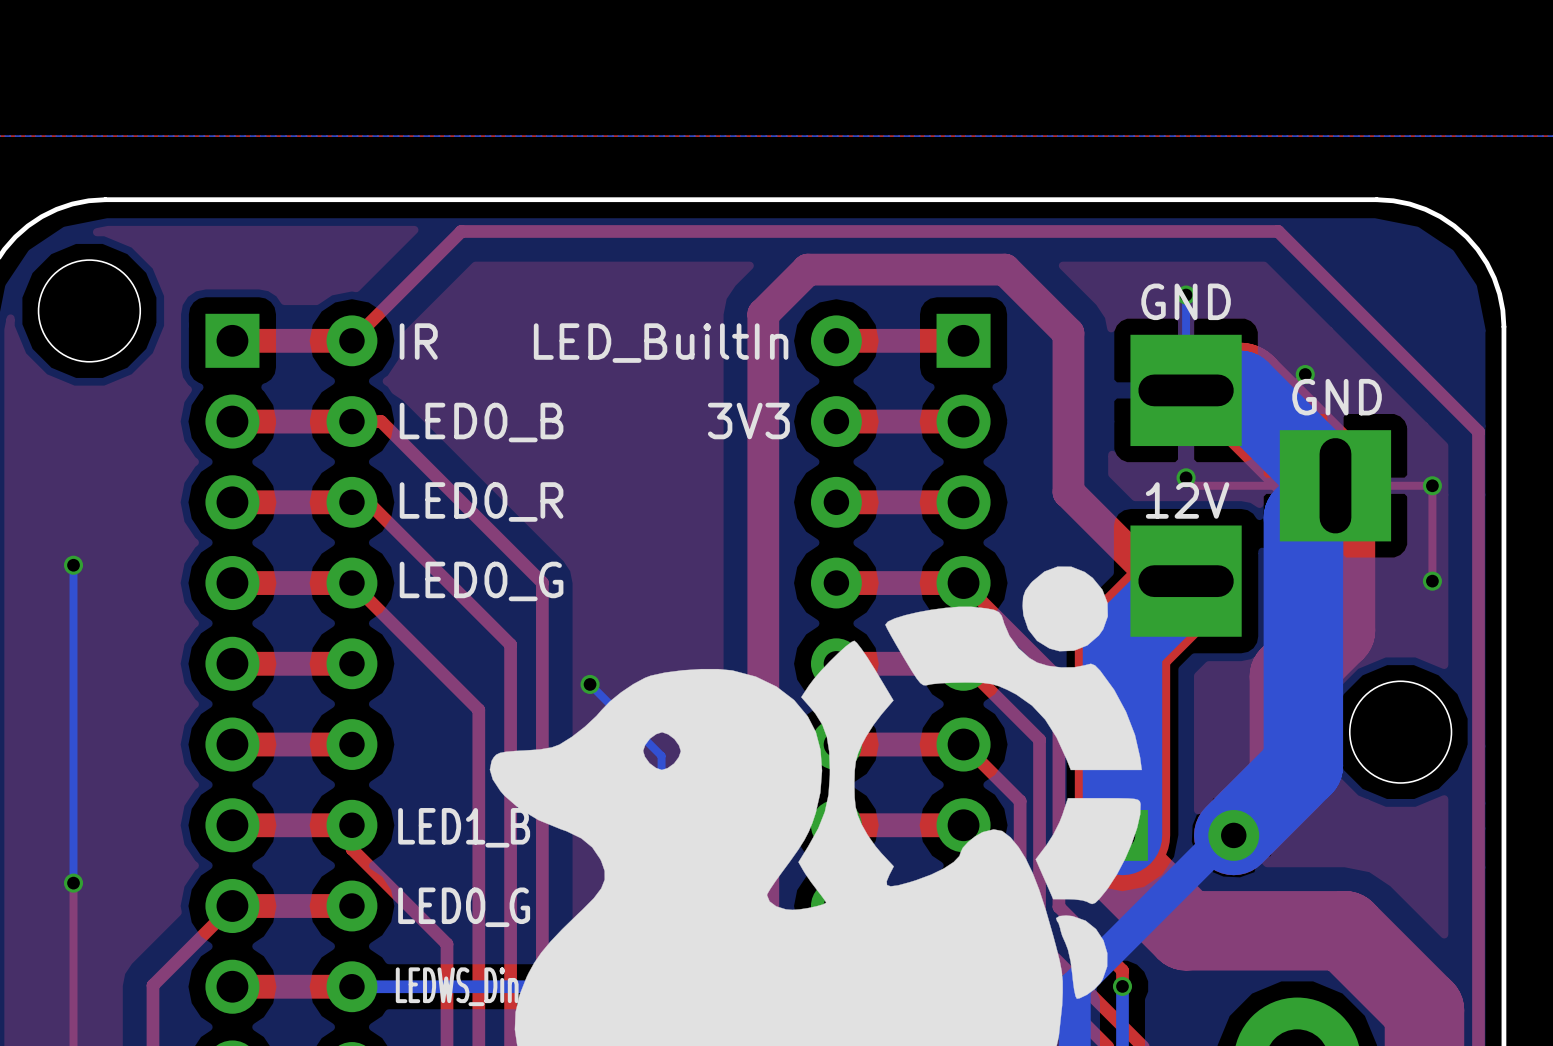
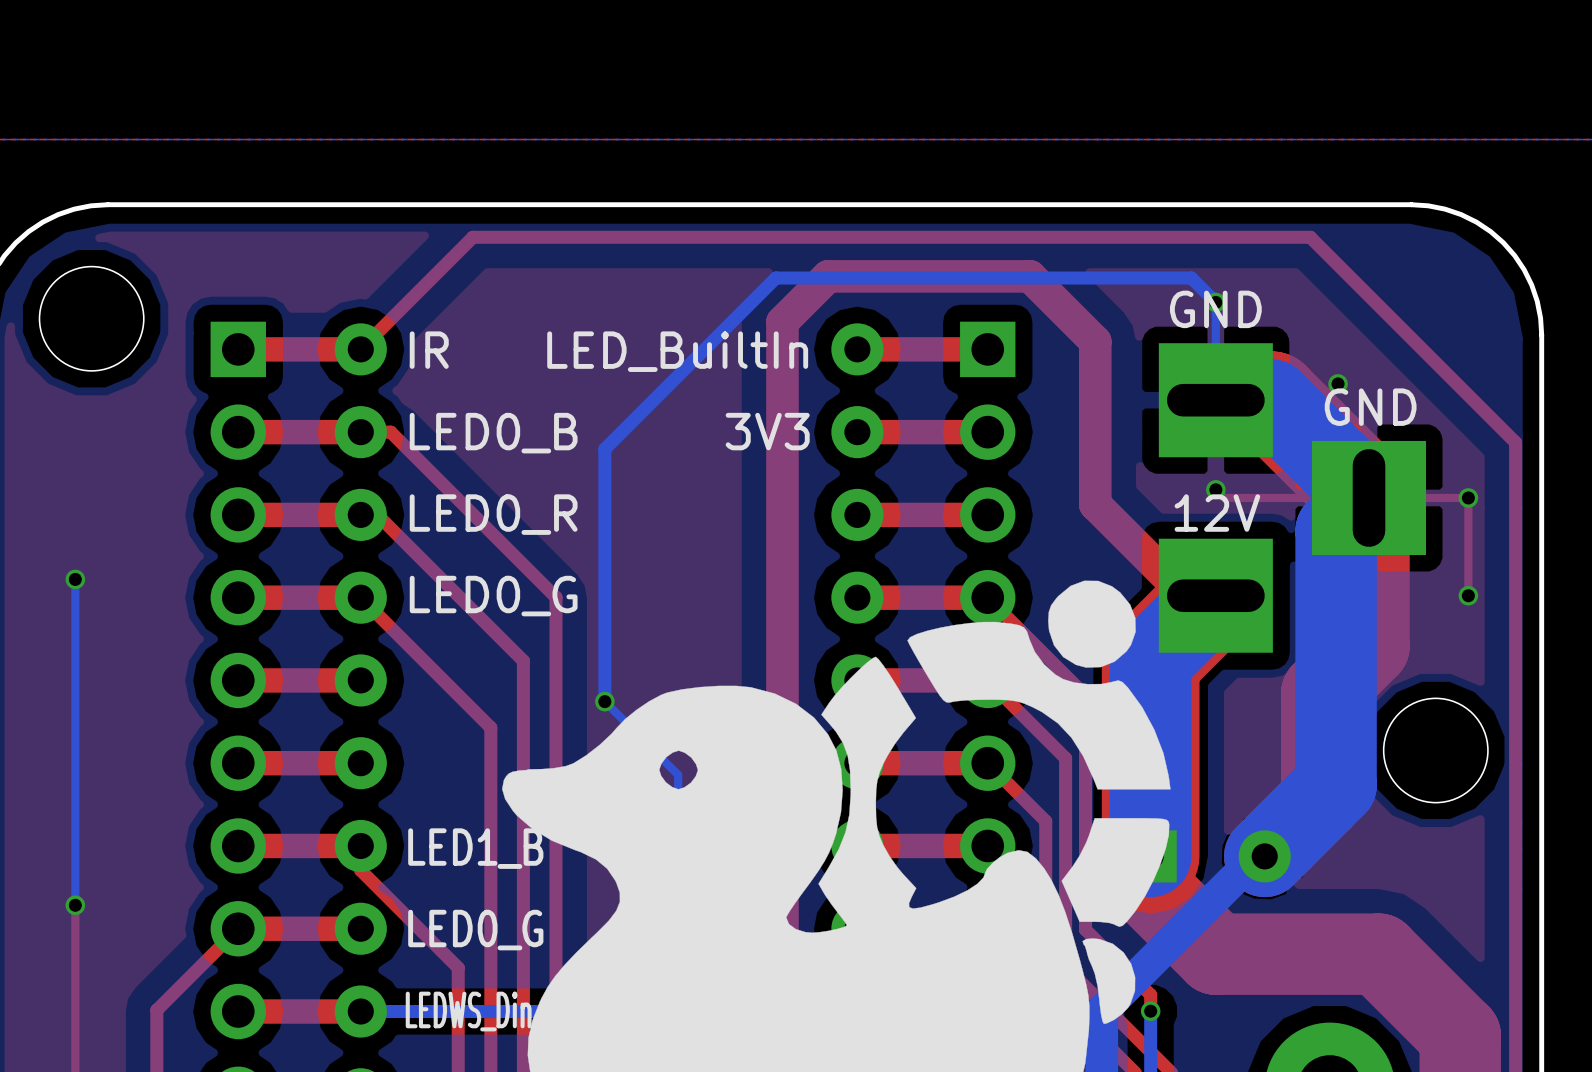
bottom track: none -> (1215, 302) (1191, 278) (775, 278) (604, 449) (604, 701)

